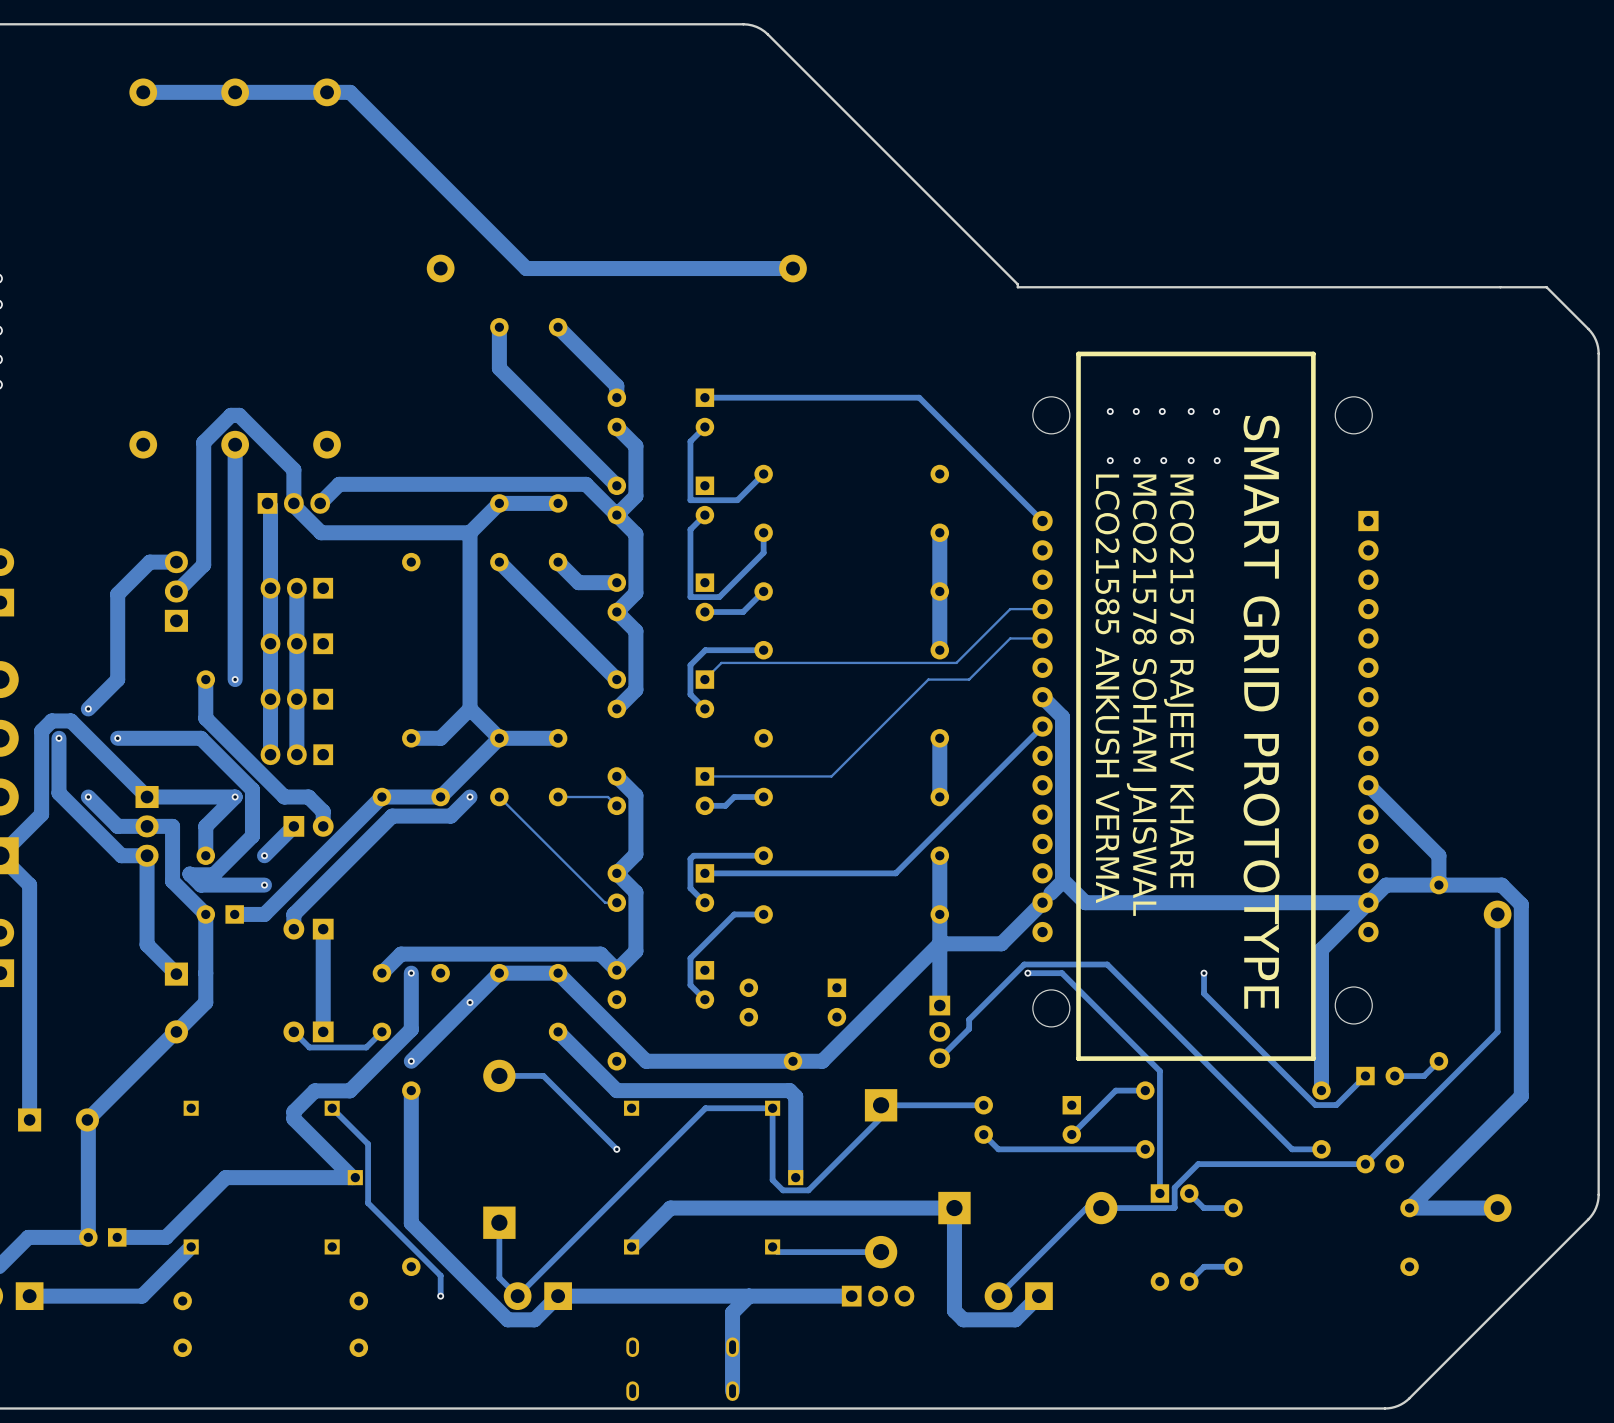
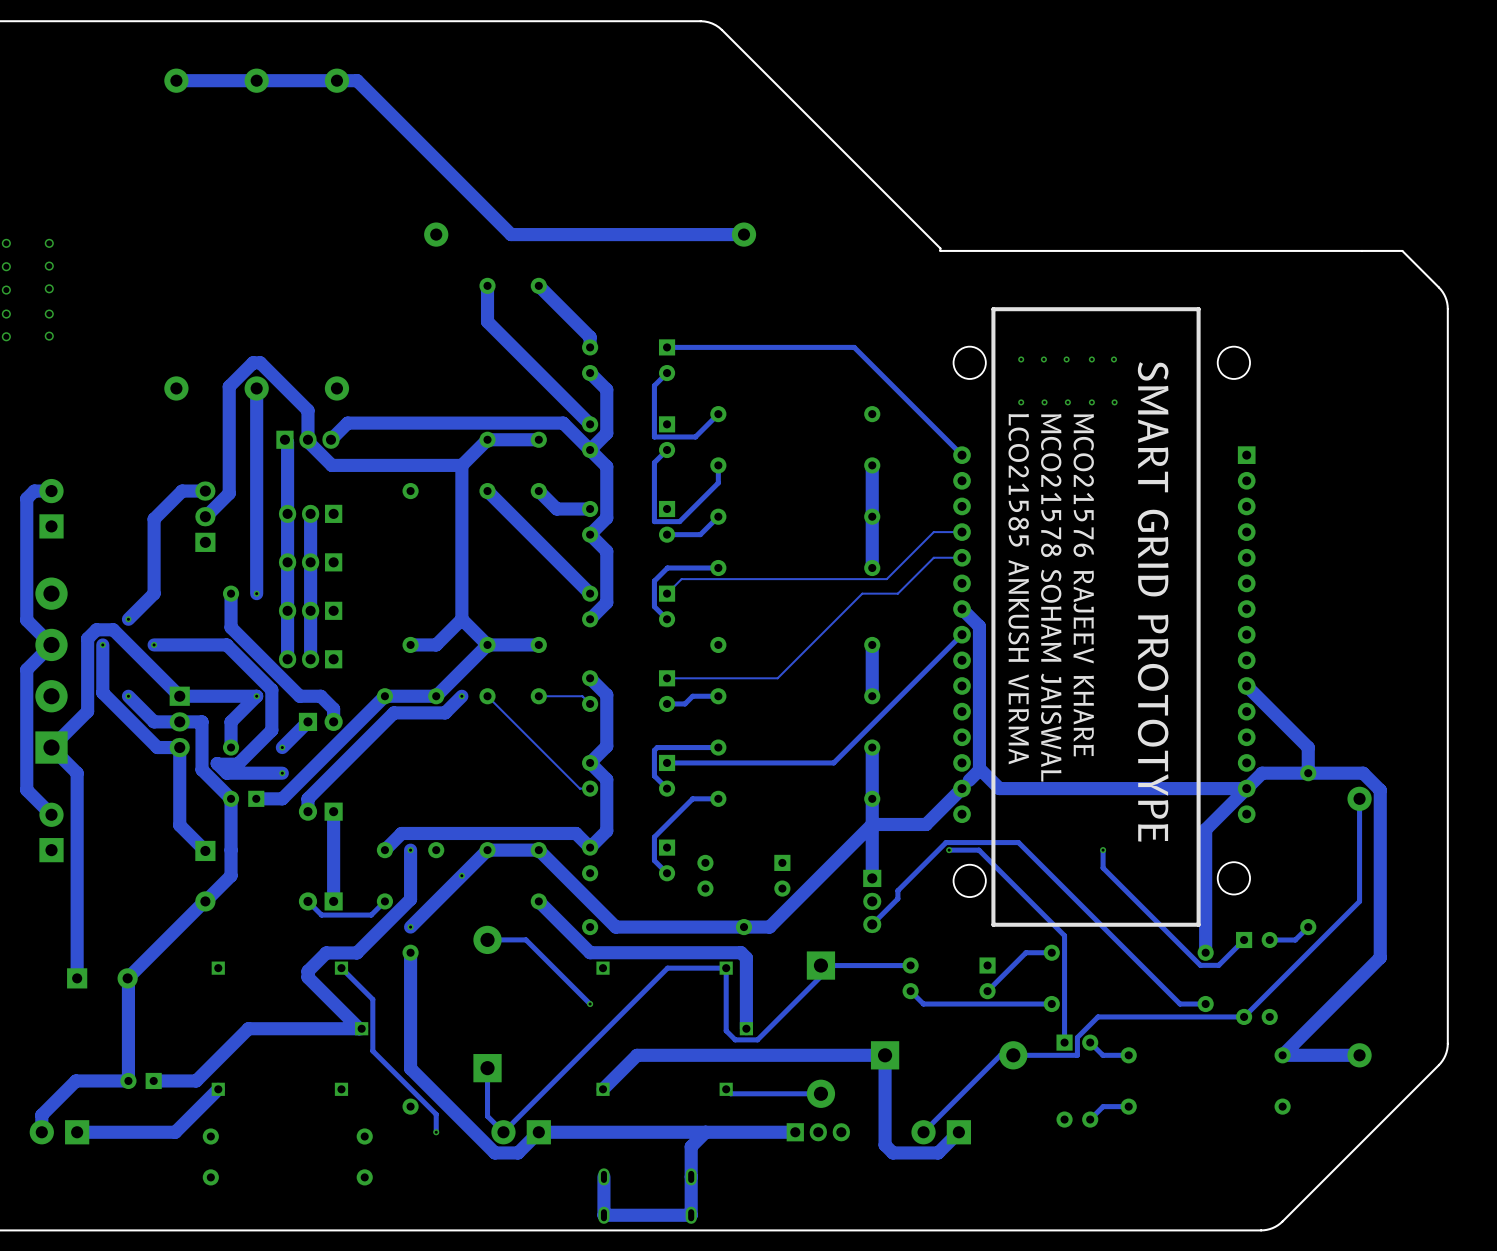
track: none -> (603, 1176) (603, 1215) (691, 1215)

